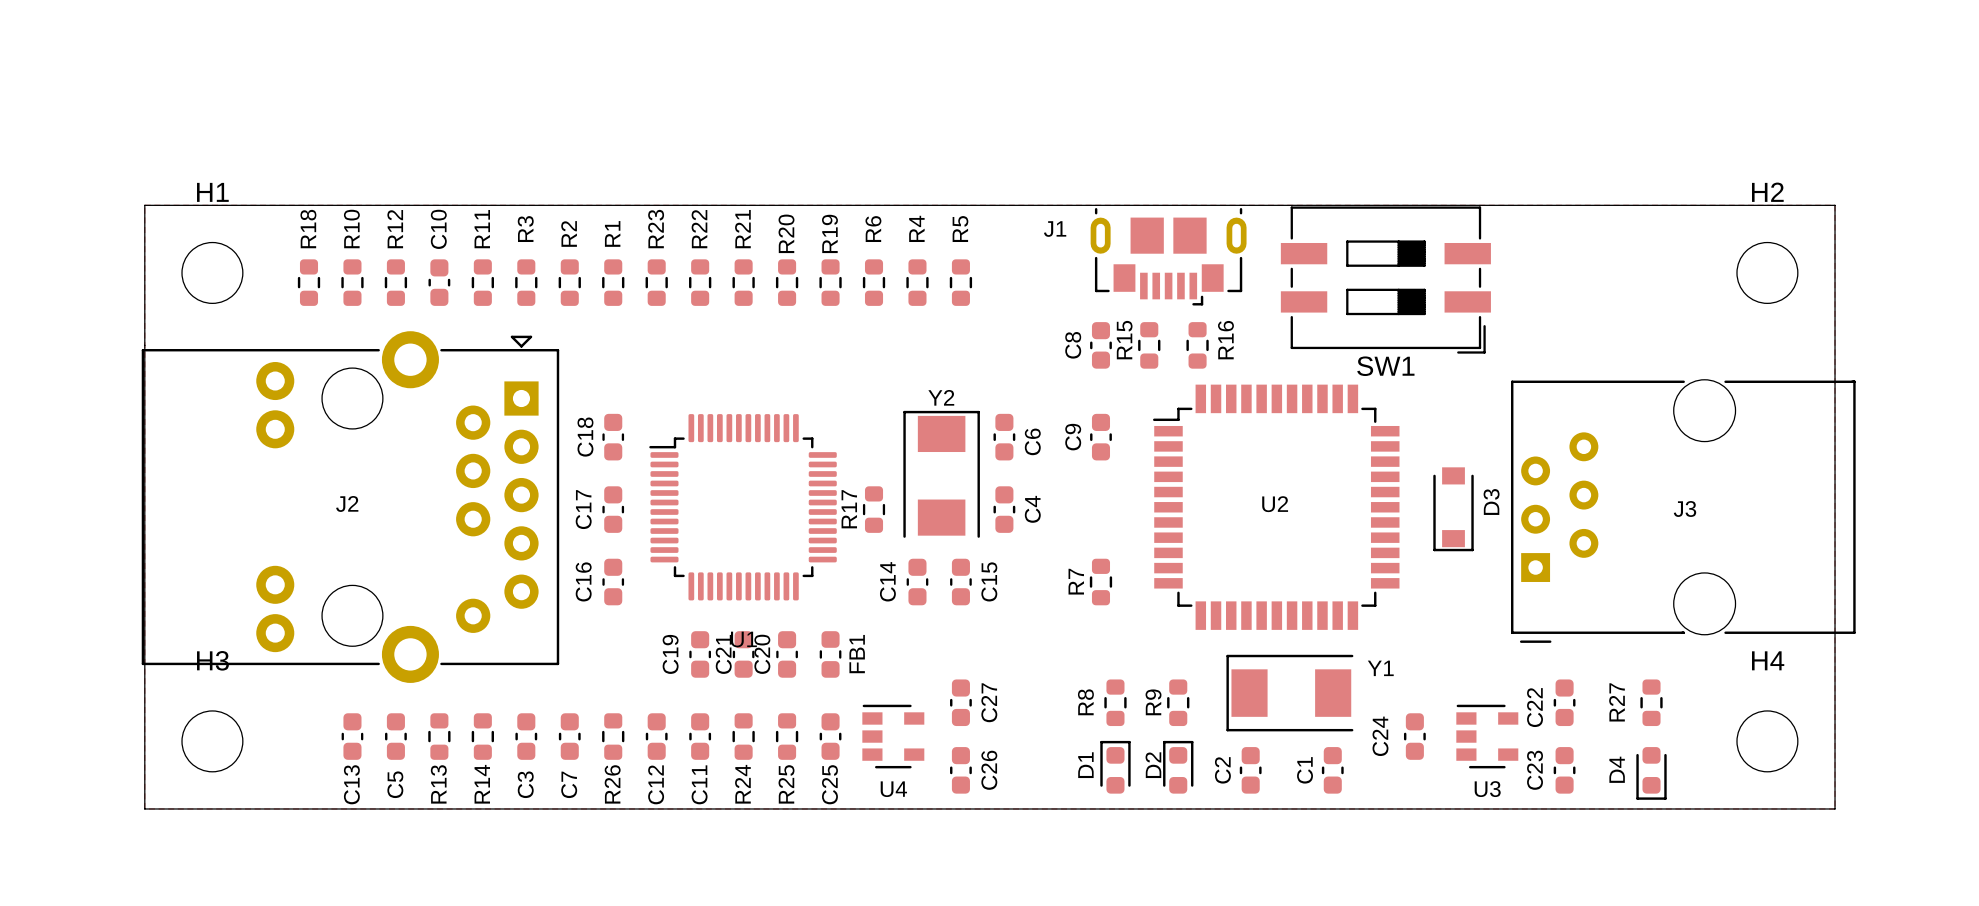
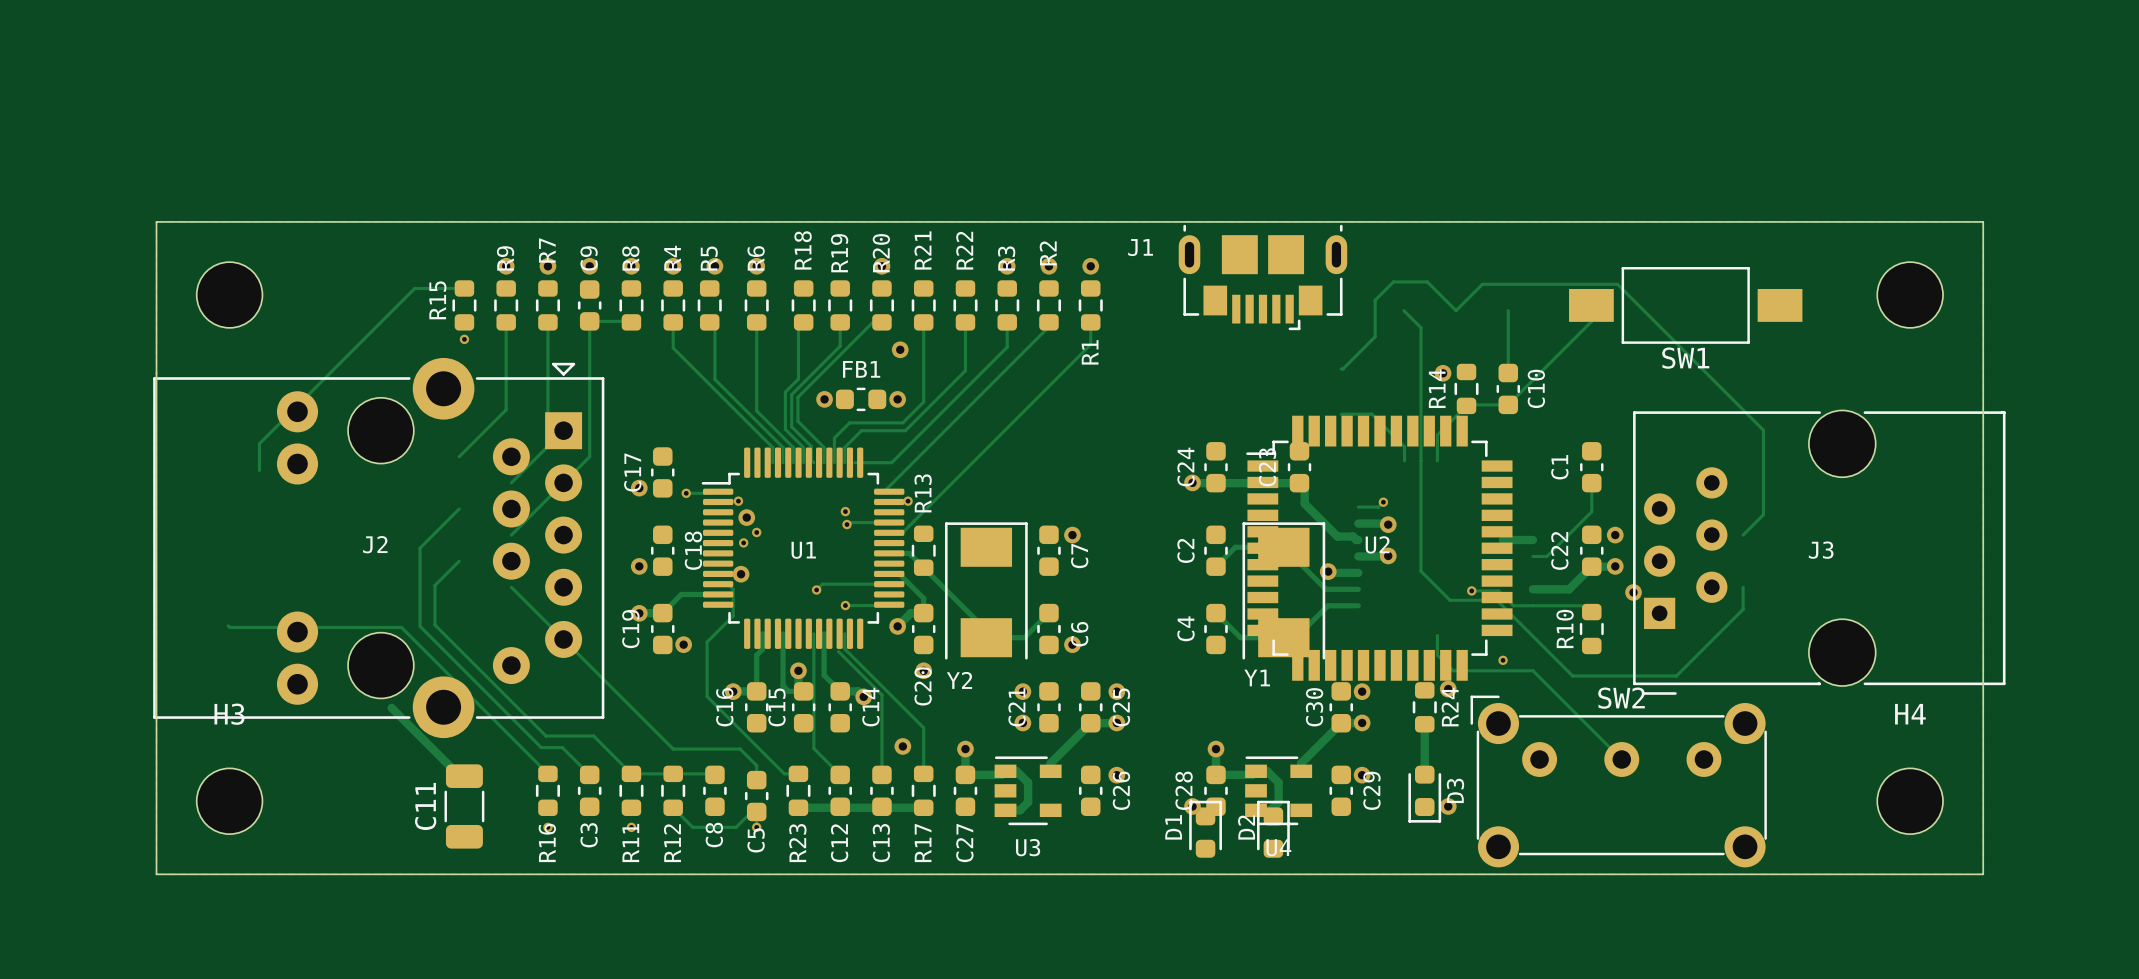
H1 name: H1 (212, 192) -> none
H2 name: H2 (1767, 192) -> none
SW1 footprint: [1280, 206, 1491, 354] -> [1569, 267, 1803, 344]
R4 name position: R4 (916, 228) -> R4 (672, 258)
R10 name position: R10 (351, 229) -> R10 (1565, 628)
R12 name position: R12 (395, 229) -> R12 (672, 843)
C10 name position: C10 (438, 229) -> C10 (1536, 388)
R11 name position: R11 (482, 229) -> R11 (630, 842)
R3 name position: R3 (525, 229) -> R3 (1006, 258)
R23 name: R23 (656, 229) -> R5 (709, 258)
R22 name: R22 (699, 229) -> R6 (756, 258)
R21 name: R21 (742, 229) -> R18 (803, 250)
R1 name position: R1 (612, 233) -> R1 (1090, 352)
via: none -> (506, 266)
via: none -> (547, 266)
via: none -> (589, 266)
via: none -> (631, 266)
via: none -> (673, 266)
via: none -> (714, 266)
via: none -> (756, 266)
via: none -> (881, 266)
via: none -> (1007, 266)
via: none -> (1048, 266)
via: none -> (1090, 266)
R10 footprint: [341, 259, 364, 306] -> [1579, 603, 1604, 655]
C10 footprint: [428, 259, 451, 306] -> [1496, 363, 1520, 415]
track: none -> (464, 288) (414, 288) (259, 443) (259, 470)
R18: (309, 282) -> none
R12 position: (395, 282) -> (673, 790)
R11 position: (482, 282) -> (631, 790)
R3 position: (526, 282) -> (1007, 305)
R2 position: (569, 282) -> (1048, 305)
R1 position: (613, 282) -> (1090, 305)
R20 position: (787, 282) -> (881, 305)
R19 position: (830, 282) -> (840, 305)
R21: none -> (923, 305)
R6: (874, 282) -> none
R22: none -> (965, 305)
R4 position: (917, 282) -> (673, 305)
R5: (960, 282) -> none
track: none -> (1591, 305) (1591, 321) (1508, 404) (1467, 404) (1437, 434) (1437, 460)
track: none -> (1403, 310) (1420, 327) (1420, 571) (1450, 600) (1496, 600) (1572, 675) (1676, 675) (1743, 609) (1743, 587)
track: none -> (1508, 310) (1508, 373)
track: none -> (506, 322) (506, 409) (459, 456)
track: none -> (547, 322) (547, 446) (511, 482)
track: none -> (631, 322) (589, 321) (589, 456) (511, 535)
track: none -> (673, 322) (673, 347) (772, 447) (772, 462)
track: none -> (714, 322) (714, 379) (783, 447) (783, 462)
track: none -> (756, 322) (756, 410) (793, 447) (793, 462)
track: none -> (798, 322) (798, 379) (785, 392) (785, 429) (803, 447) (803, 462)
track: none -> (840, 322) (840, 346) (791, 394) (791, 426) (811, 446) (811, 460) (813, 462)
track: none -> (881, 322) (872, 322) (797, 397) (797, 421) (824, 447) (824, 462)
track: none -> (923, 322) (923, 401) (902, 422) (849, 422) (834, 438) (834, 462)
track: none -> (965, 322) (965, 370) (905, 430) (861, 430) (844, 447) (844, 462)
track: none -> (1007, 322) (1007, 347) (891, 462) (854, 462)
track: none -> (1048, 322) (1048, 326) (883, 491)
track: none -> (1090, 322) (1090, 344) (902, 532) (883, 532)
via: none -> (464, 339)
via: none -> (900, 349)
R16 name position: R16 (1225, 340) -> R16 (547, 842)
track: none -> (1341, 368) (1375, 336) (1375, 300) (1393, 281) (1427, 281) (1456, 310) (1482, 284) (1617, 284) (1763, 430) (1763, 514) (1743, 535)
C8 name position: C8 (1073, 345) -> C8 (714, 835)
C8 position: (1100, 345) -> (714, 790)
R15 position: (1149, 345) -> (464, 305)
R16 position: (1197, 345) -> (547, 790)
via: none -> (1443, 373)
via: none -> (824, 399)
via: none -> (897, 399)
track: none -> (1341, 414) (1371, 414) (1404, 446) (1404, 460)
Y2 name position: Y2 (941, 397) -> Y2 (959, 680)
C18 name: C18 (585, 437) -> C17 (632, 472)
C6 position: (1004, 437) -> (1048, 629)
C9 name position: C9 (1073, 437) -> C9 (589, 258)
C9 position: (1100, 437) -> (589, 305)
via: none -> (1192, 482)
track: none -> (1192, 483) (1299, 483) (1304, 488) (1304, 503) (1337, 536) (1352, 536) (1358, 540)
track: none -> (1591, 483) (1591, 511) (1547, 556) (1532, 556)
via: none -> (639, 488)
track: none -> (712, 491) (711, 493) (686, 493)
via: none -> (686, 493)
via: none -> (738, 501)
via: none -> (908, 501)
track: none -> (1383, 502) (1378, 507) (1358, 507)
via: none -> (1383, 502)
D3 footprint: [1433, 467, 1474, 552] -> [1408, 765, 1442, 823]
track: none -> (459, 508) (420, 548) (420, 626) (541, 747) (562, 747) (589, 774)
via: none -> (845, 511)
Y2 position: (941, 474) -> (986, 590)
via: none -> (746, 517)
track: none -> (883, 522) (849, 522) (847, 524)
track: none -> (1358, 523) (1388, 524)
via: none -> (847, 524)
via: none -> (1388, 524)
R17 footprint: [862, 486, 886, 533] -> [911, 765, 936, 816]
via: none -> (756, 532)
via: none -> (1072, 535)
via: none -> (1615, 535)
track: none -> (1503, 540) (1532, 540)
via: none -> (743, 542)
C17 name: C17 (583, 509) -> C18 (693, 550)
R17 name position: R17 (849, 509) -> R17 (923, 843)
C4 position: (1004, 509) -> (1215, 629)
C4 name position: C4 (1032, 509) -> C4 (1186, 628)
track: none -> (883, 553) (909, 553) (986, 630) (986, 637) (1024, 637) (1048, 613)
track: none -> (1388, 555) (1358, 556)
via: none -> (1388, 555)
track: none -> (459, 561) (435, 585) (435, 624) (546, 736) (593, 736) (631, 773) (714, 774)
via: none -> (639, 566)
track: none -> (1215, 566) (1235, 547) (1283, 547) (1325, 589) (1358, 589)
track: none -> (1614, 566) (1591, 566) (1569, 589) (1532, 589)
via: none -> (1615, 566)
track: none -> (1328, 571) (1358, 572)
via: none -> (1328, 571)
via: none -> (741, 574)
track: none -> (883, 573) (899, 573) (923, 598) (923, 613) (910, 613) (897, 626)
track: none -> (712, 584) (728, 584) (733, 589) (733, 615) (707, 642) (707, 696) (784, 773) (798, 773)
track: none -> (883, 584) (822, 584) (816, 590)
track: none -> (511, 587) (673, 749) (740, 749) (756, 765) (756, 774)
via: none -> (816, 590)
track: none -> (1471, 590) (1498, 590) (1513, 605) (1585, 605) (1591, 612)
via: none -> (1471, 590)
via: none -> (1633, 592)
track: none -> (712, 594) (681, 594) (662, 613) (639, 613)
track: none -> (883, 604) (845, 605)
via: none -> (845, 605)
track: none -> (1358, 605) (1327, 605) (1296, 637) (1240, 637) (1215, 613)
via: none -> (639, 613)
track: none -> (228, 625) (229, 627) (401, 627) (547, 773)
via: none -> (897, 626)
C16 name: C16 (583, 581) -> C19 (630, 629)
C14 name position: C14 (887, 581) -> C14 (870, 707)
R7 name position: R7 (1076, 581) -> R7 (547, 250)
C15: (917, 582) -> none
C14 position: (960, 582) -> (840, 707)
R7 position: (1100, 582) -> (547, 305)
track: none -> (762, 633) (762, 649) (756, 655) (756, 691) (733, 691)
track: none -> (783, 633) (783, 685) (788, 691) (798, 691) (798, 670)
track: none -> (813, 633) (813, 748) (840, 774)
track: none -> (824, 633) (824, 675) (840, 691) (858, 691) (863, 696)
track: none -> (844, 633) (844, 648) (923, 727) (923, 773)
track: none -> (1437, 635) (1437, 655) (1453, 670) (1533, 670) (1621, 759)
via: none -> (683, 644)
via: none -> (1072, 644)
track: none -> (838, 651) (881, 695) (881, 774)
via: none -> (1503, 660)
via: none -> (798, 670)
via: none -> (923, 670)
via: none -> (1448, 689)
via: none -> (733, 691)
U1 name position: U1 (743, 639) -> U1 (803, 550)
via: none -> (1022, 691)
via: none -> (1116, 691)
via: none -> (1362, 691)
via: none -> (863, 696)
track: none -> (391, 707) (459, 776) (464, 776)
C19 name: C19 (670, 654) -> C16 (724, 707)
C21 name: C21 (723, 654) -> C15 (776, 707)
C20 name position: C20 (762, 654) -> C20 (923, 686)
C20 position: (787, 654) -> (923, 629)
FB1 rotation: 0° (830, 654) -> 90° clockwise (861, 399)
FB1 position: (830, 654) -> (861, 399)
FB1 name position: FB1 (857, 654) -> FB1 (861, 369)
C21: none -> (1048, 707)
C30: none -> (1341, 707)
via: none -> (1022, 722)
via: none -> (1116, 722)
via: none -> (1362, 722)
Y1 name position: Y1 (1380, 668) -> Y1 (1257, 677)
track: none -> (1116, 723) (1090, 723) (1050, 763) (1050, 771)
track: none -> (1361, 723) (1341, 723) (1301, 763) (1301, 771)
track: none -> (1424, 724) (1424, 774)
C22 footprint: [1553, 679, 1576, 727] -> [1580, 525, 1604, 576]
via: none -> (902, 746)
track: none -> (965, 749) (965, 774) (1001, 774) (1005, 771) (1016, 771) (1028, 782) (1028, 802) (1019, 810) (1005, 810)
via: none -> (965, 749)
track: none -> (1215, 749) (1215, 774) (1252, 774) (1256, 771) (1267, 771) (1278, 782) (1278, 802) (1270, 810) (1256, 810)
via: none -> (1215, 749)
Y1 rotation: 0° (1289, 693) -> 90° clockwise (1283, 590)
Y1 position: (1289, 693) -> (1283, 590)
C27 position: (960, 702) -> (965, 790)
C27 name position: C27 (989, 702) -> C27 (964, 843)
R8 name position: R8 (1085, 702) -> R8 (630, 258)
R8 position: (1115, 702) -> (631, 305)
R9 name position: R9 (1153, 702) -> R9 (505, 258)
R9 position: (1178, 702) -> (506, 305)
R27: (1651, 702) -> none
C13 footprint: [341, 713, 364, 760] -> [870, 765, 894, 816]
R13 footprint: [428, 713, 451, 760] -> [911, 525, 936, 576]
C24 footprint: [1403, 713, 1426, 760] -> [1204, 442, 1228, 493]
via: none -> (1116, 775)
via: none -> (1362, 775)
SW2: none -> (1618, 781)
R23: none -> (798, 790)
C28: none -> (1215, 790)
C29: none -> (1341, 790)
C5: (395, 736) -> none
R14 position: (482, 736) -> (1466, 388)
C3 position: (526, 736) -> (589, 790)
C7 position: (569, 736) -> (1048, 550)
R26: (613, 736) -> none
C12 position: (656, 736) -> (840, 790)
R24 position: (743, 736) -> (1424, 707)
R25: (787, 736) -> none
C25 position: (830, 736) -> (1090, 707)
U4 position: (893, 736) -> (1278, 790)
U3 position: (1487, 736) -> (1028, 790)
C11: none -> (464, 806)
via: none -> (1192, 806)
via: none -> (1448, 806)
track: none -> (673, 807) (692, 827) (736, 827) (756, 806) (756, 827)
track: none -> (798, 807) (923, 807)
C1 footprint: [1321, 747, 1344, 794] -> [1580, 442, 1604, 493]
C23 footprint: [1553, 747, 1576, 794] -> [1287, 442, 1312, 493]
via: none -> (547, 827)
via: none -> (631, 827)
via: none -> (756, 827)
C26 position: (960, 770) -> (1090, 790)
C2 position: (1250, 770) -> (1215, 550)
D4: (1651, 773) -> none
R13 name position: R13 (438, 784) -> R13 (923, 493)
R14 name position: R14 (482, 784) -> R14 (1437, 388)
C3 name position: C3 (525, 784) -> C3 (589, 835)
C7 name position: C7 (569, 784) -> C7 (1079, 556)
C11 name: C11 (699, 784) -> C5 (756, 840)
R24 name position: R24 (742, 784) -> R24 (1450, 707)
C25 name position: C25 (829, 784) -> C25 (1121, 707)

